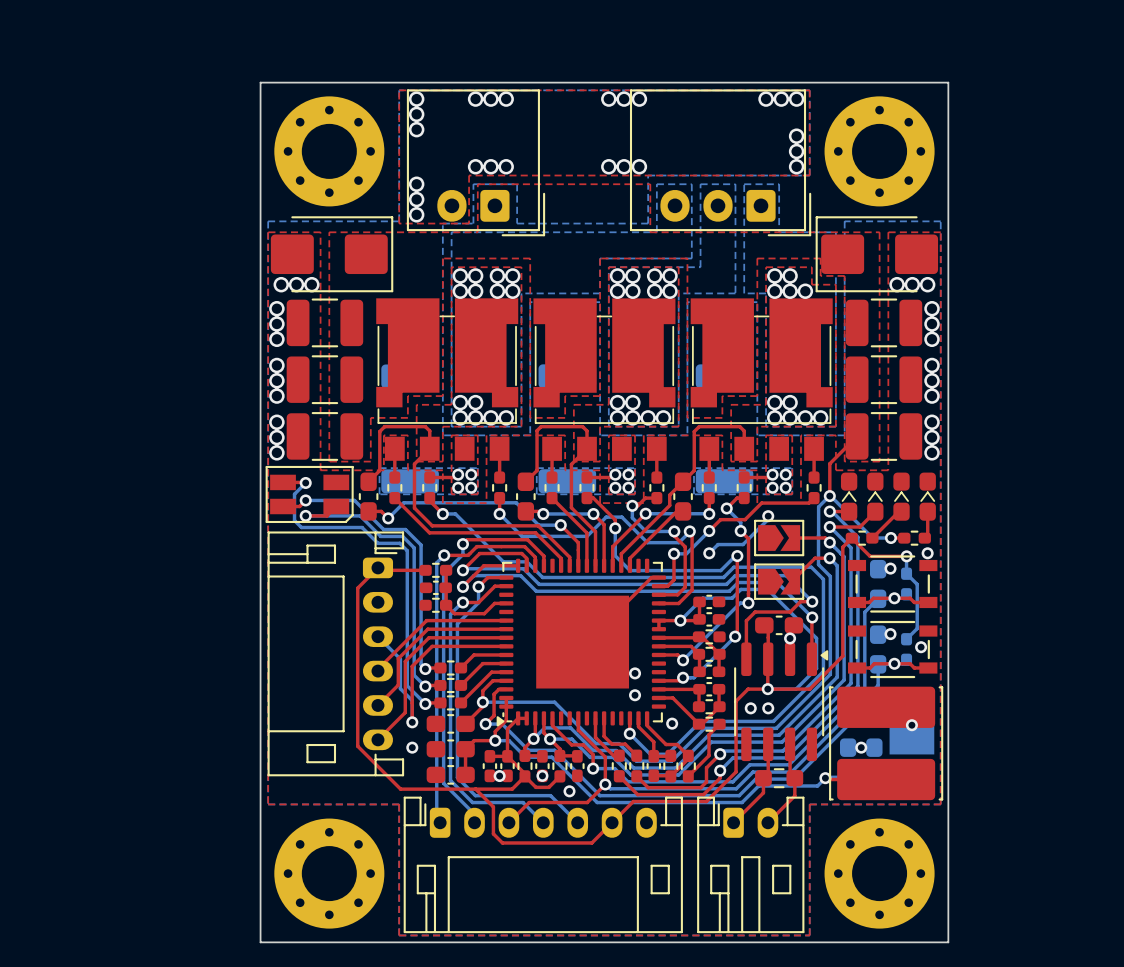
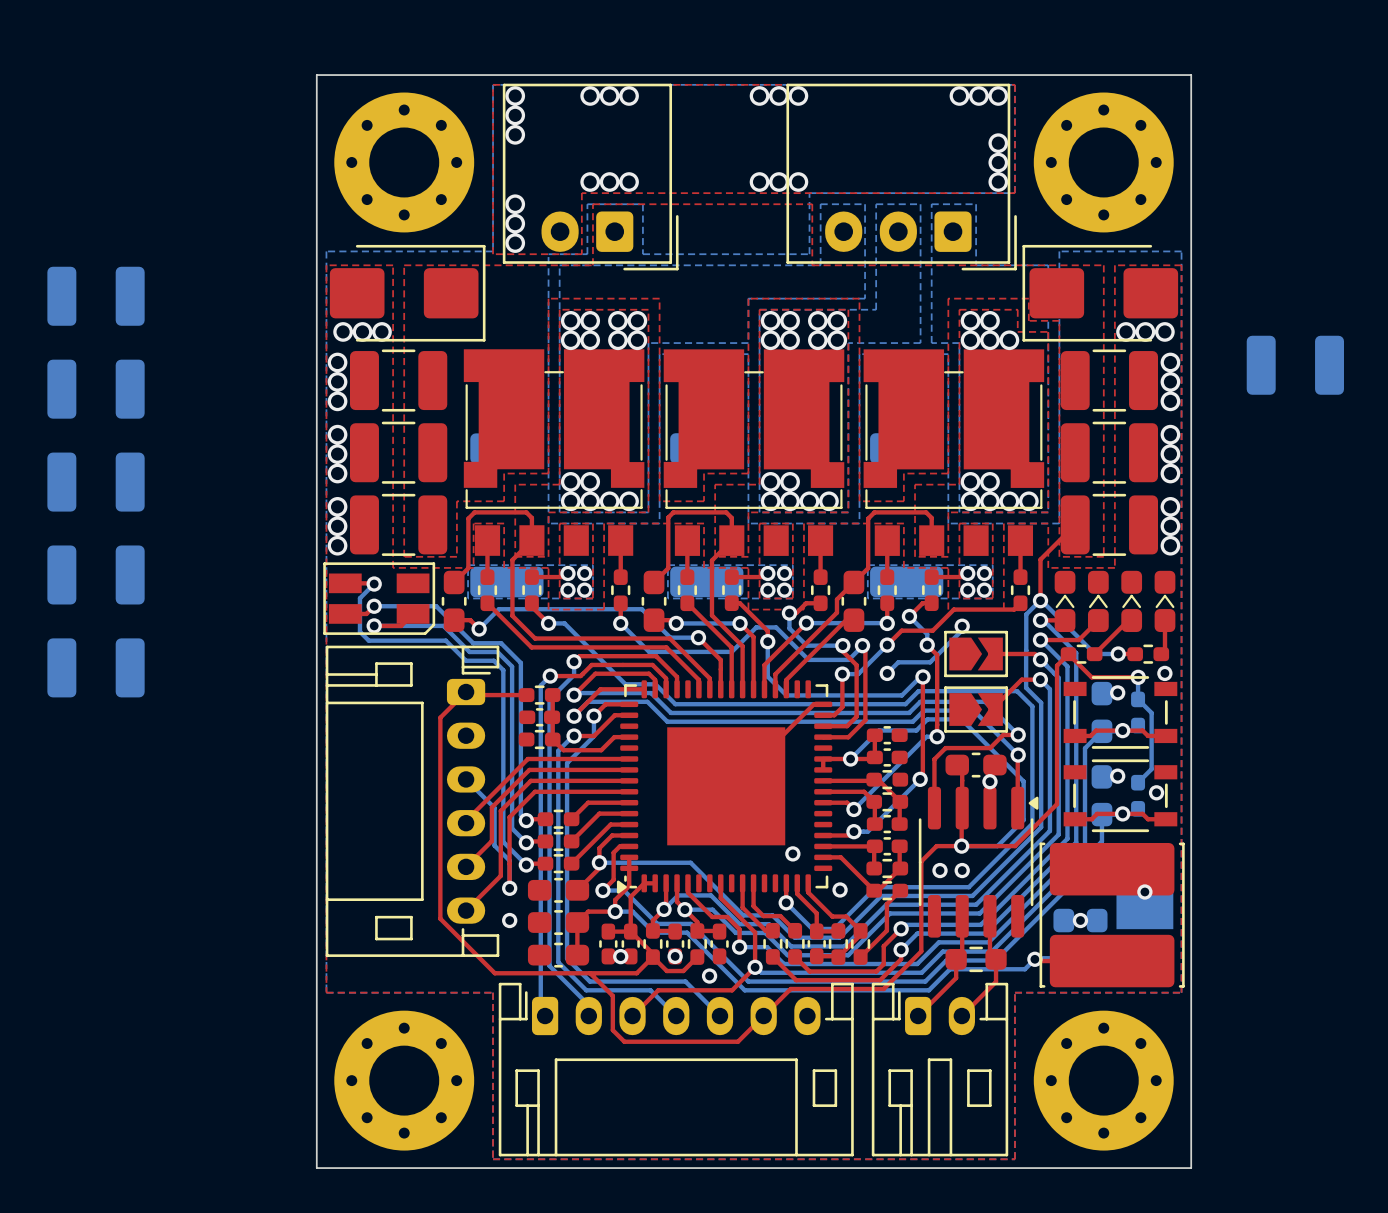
part: none -> (96, 296)
part: none -> (1295, 365)
part: none -> (96, 389)
part: none -> (96, 482)
part: none -> (96, 574)
part: none -> (96, 667)
via: (635, 673) -> none

